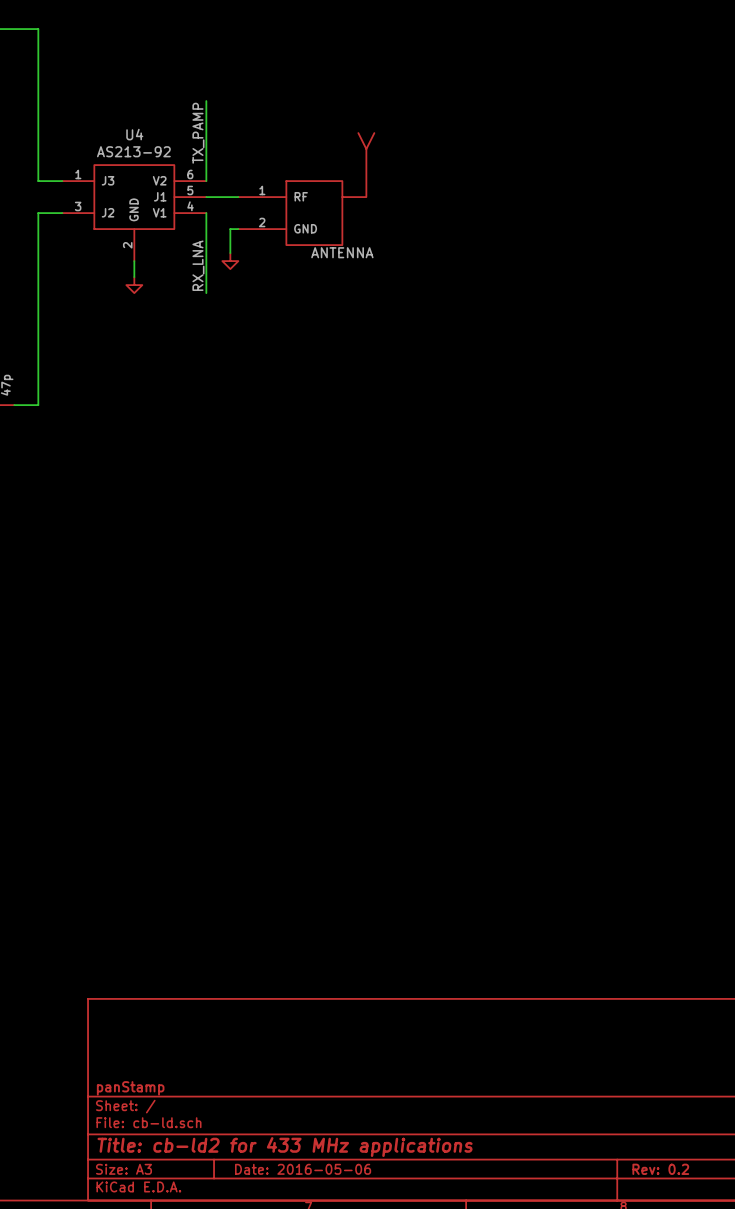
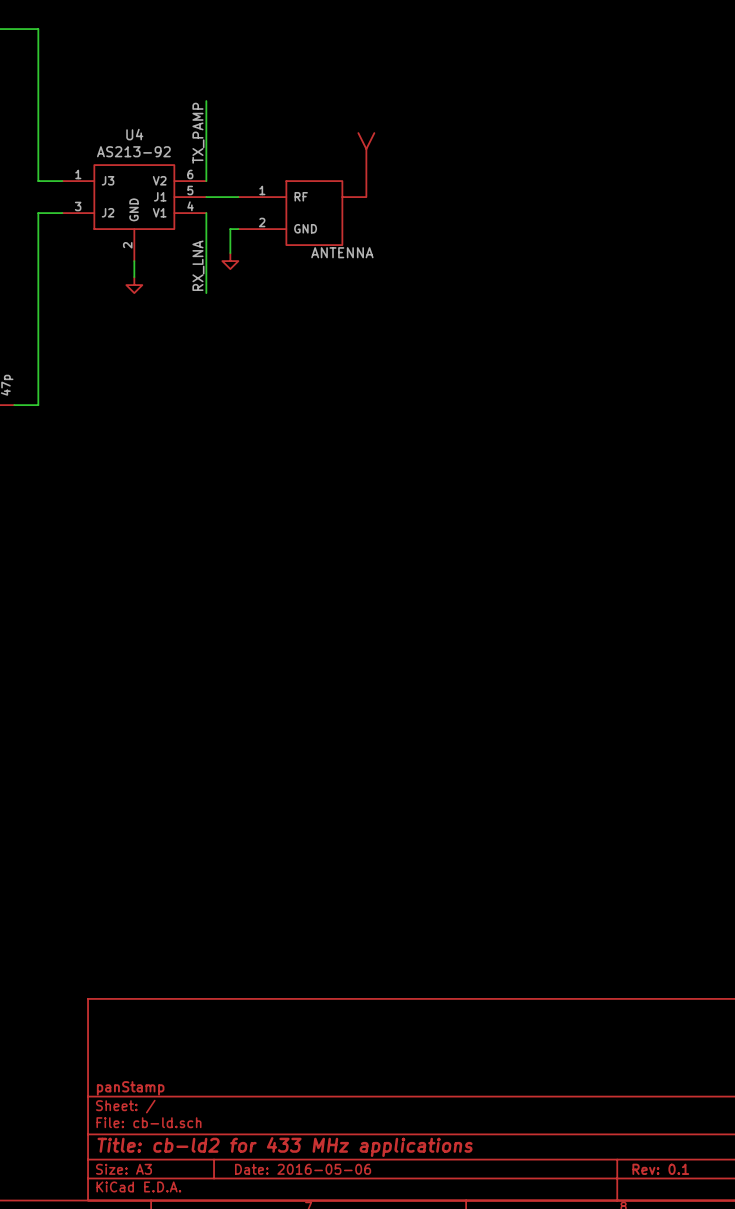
title block: Rev: 0.2 (660, 1169) -> Rev: 0.1 (660, 1169)

